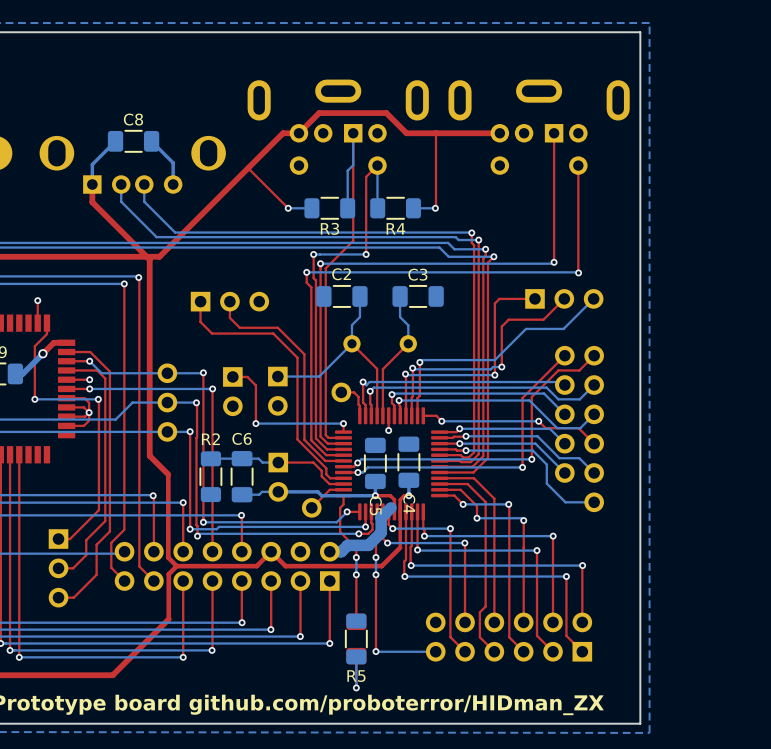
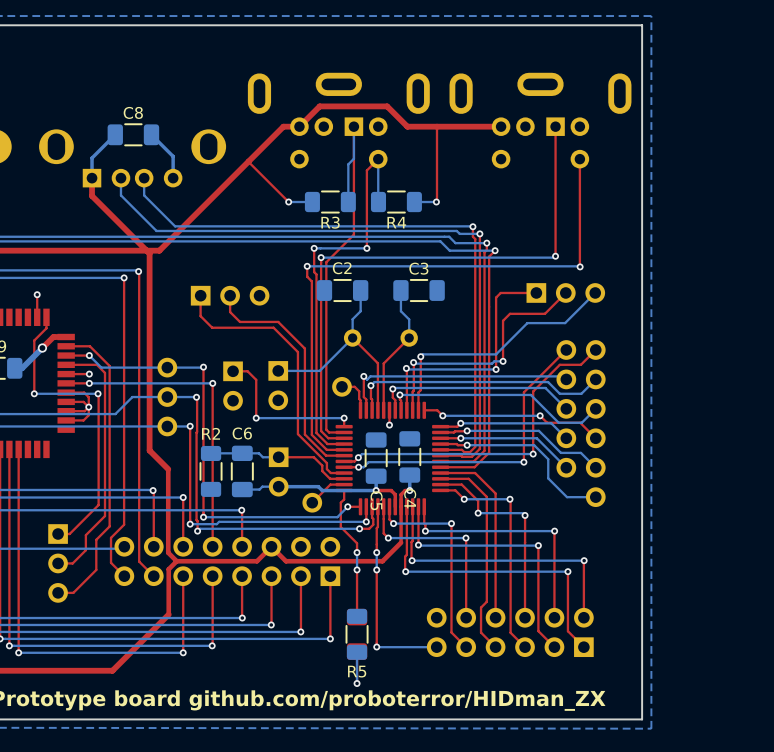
bottom track: (390, 507) (381, 517) (381, 532) (368, 545) (347, 545) (341, 551) (329, 551) -> none

